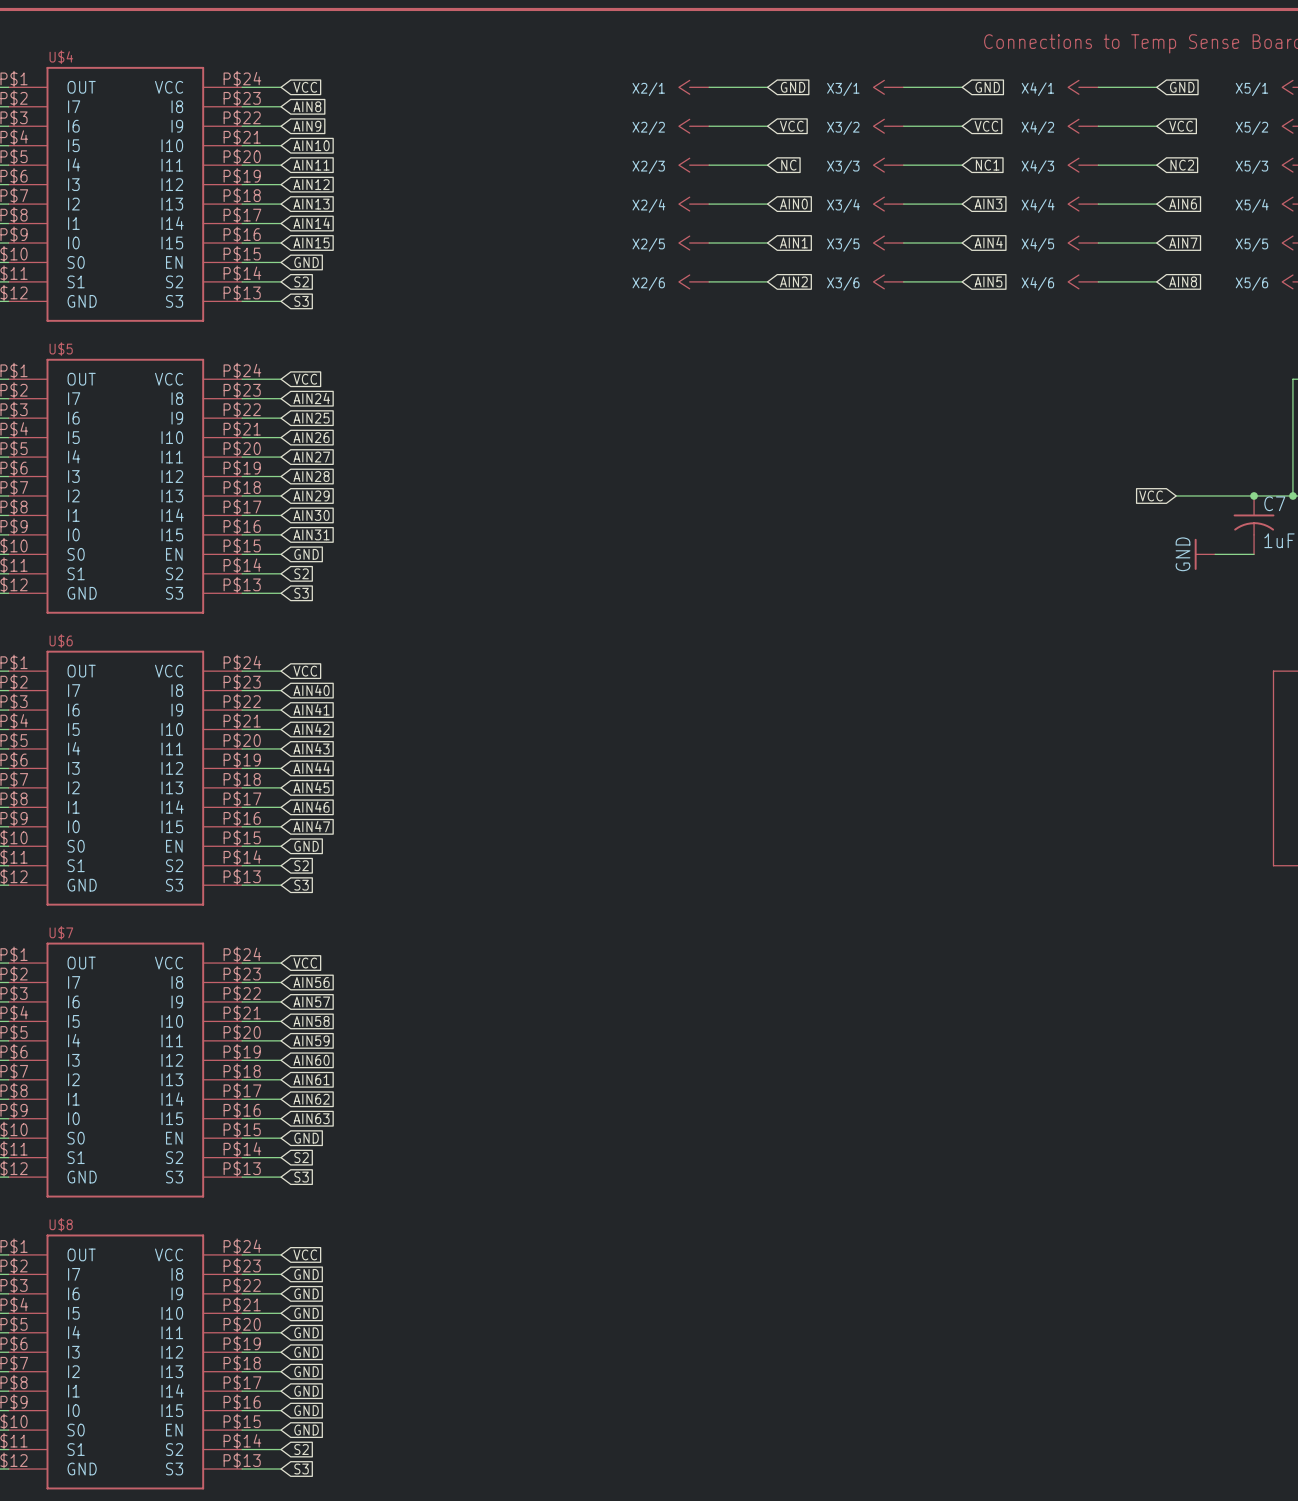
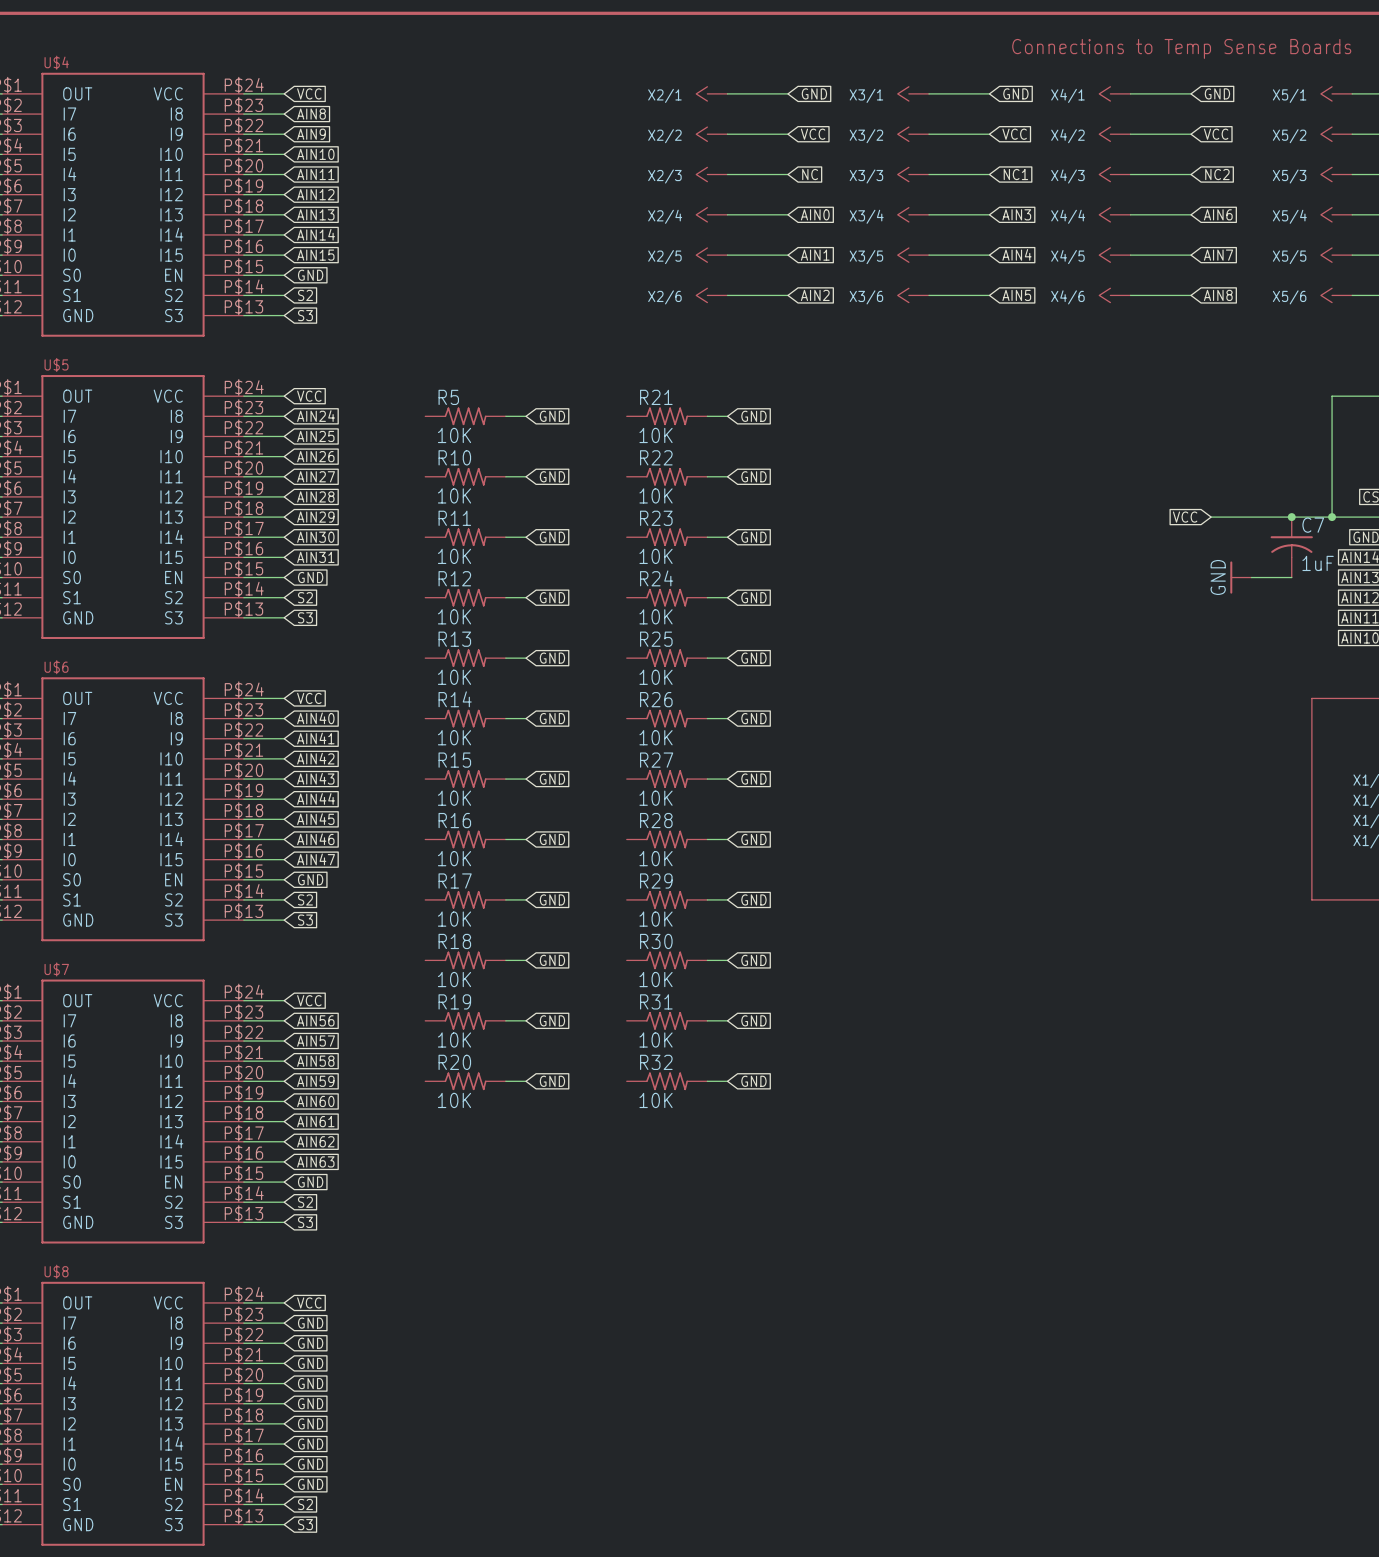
R5: none -> 10K (465, 416)
wire: none -> (505, 416) (526, 416)
global label: none -> GND (552, 416)
R21: none -> 10K (667, 416)
wire: none -> (707, 416) (727, 416)
global label: none -> GND (753, 416)
R10: none -> 10K (465, 476)
wire: none -> (505, 476) (526, 476)
global label: none -> GND (552, 476)
R22: none -> 10K (667, 476)
wire: none -> (707, 476) (727, 476)
global label: none -> GND (753, 476)
R11: none -> 10K (465, 537)
wire: none -> (505, 537) (526, 537)
global label: none -> GND (552, 537)
R23: none -> 10K (667, 537)
wire: none -> (707, 537) (727, 537)
global label: none -> GND (753, 537)
R12: none -> 10K (465, 597)
wire: none -> (505, 597) (526, 597)
global label: none -> GND (552, 597)
R24: none -> 10K (667, 597)
wire: none -> (707, 597) (727, 597)
global label: none -> GND (753, 597)
R13: none -> 10K (465, 658)
wire: none -> (505, 658) (526, 658)
global label: none -> GND (552, 658)
R25: none -> 10K (667, 658)
wire: none -> (707, 658) (727, 658)
global label: none -> GND (753, 658)
R14: none -> 10K (465, 718)
wire: none -> (505, 718) (526, 718)
global label: none -> GND (552, 718)
R26: none -> 10K (667, 718)
wire: none -> (707, 718) (727, 718)
global label: none -> GND (753, 718)
R15: none -> 10K (465, 779)
wire: none -> (505, 779) (526, 779)
global label: none -> GND (552, 779)
R27: none -> 10K (667, 779)
wire: none -> (707, 779) (727, 779)
global label: none -> GND (753, 779)
R16: none -> 10K (465, 839)
wire: none -> (505, 839) (526, 839)
global label: none -> GND (552, 839)
R28: none -> 10K (667, 839)
wire: none -> (707, 839) (727, 839)
global label: none -> GND (753, 839)
R17: none -> 10K (465, 899)
wire: none -> (505, 899) (526, 899)
global label: none -> GND (552, 899)
R29: none -> 10K (667, 899)
wire: none -> (707, 899) (727, 899)
global label: none -> GND (753, 899)
R18: none -> 10K (465, 960)
wire: none -> (505, 960) (526, 960)
global label: none -> GND (552, 960)
R30: none -> 10K (667, 960)
wire: none -> (707, 960) (727, 960)
global label: none -> GND (753, 960)
R19: none -> 10K (465, 1020)
wire: none -> (505, 1020) (526, 1020)
global label: none -> GND (552, 1020)
R31: none -> 10K (667, 1020)
wire: none -> (707, 1020) (727, 1020)
global label: none -> GND (753, 1020)
R20: none -> 10K (465, 1081)
wire: none -> (505, 1081) (526, 1081)
global label: none -> GND (552, 1081)
R32: none -> 10K (667, 1081)
wire: none -> (707, 1081) (727, 1081)
global label: none -> GND (753, 1081)

